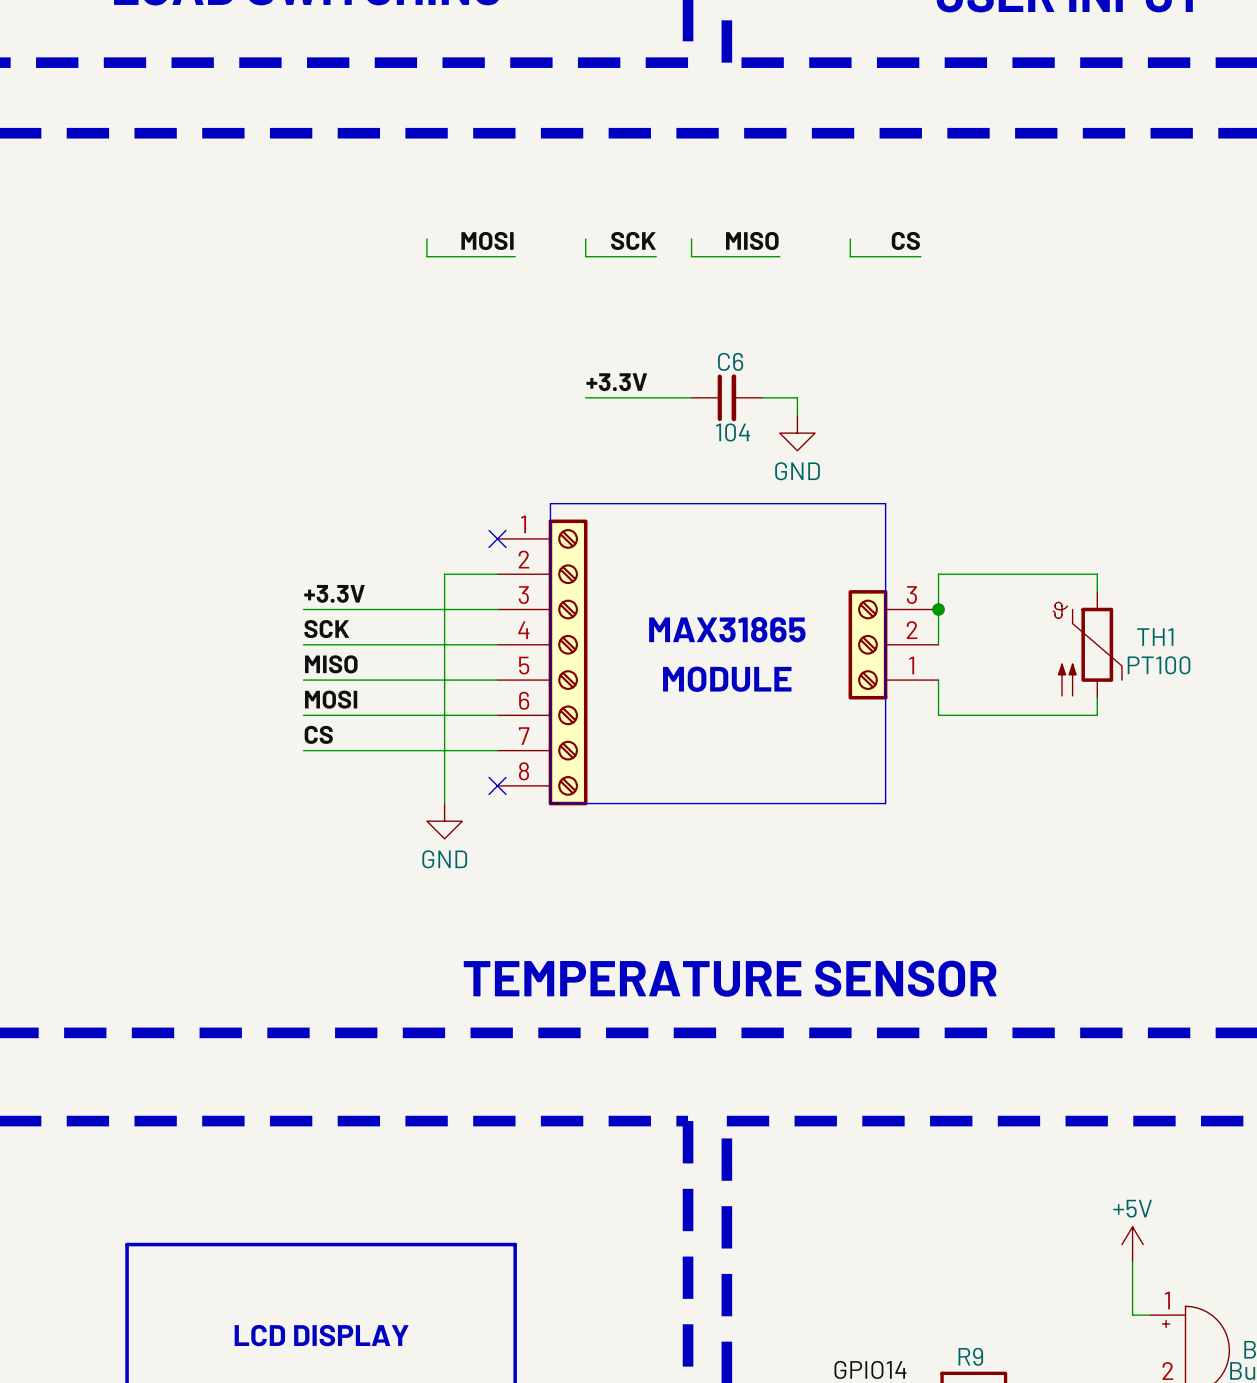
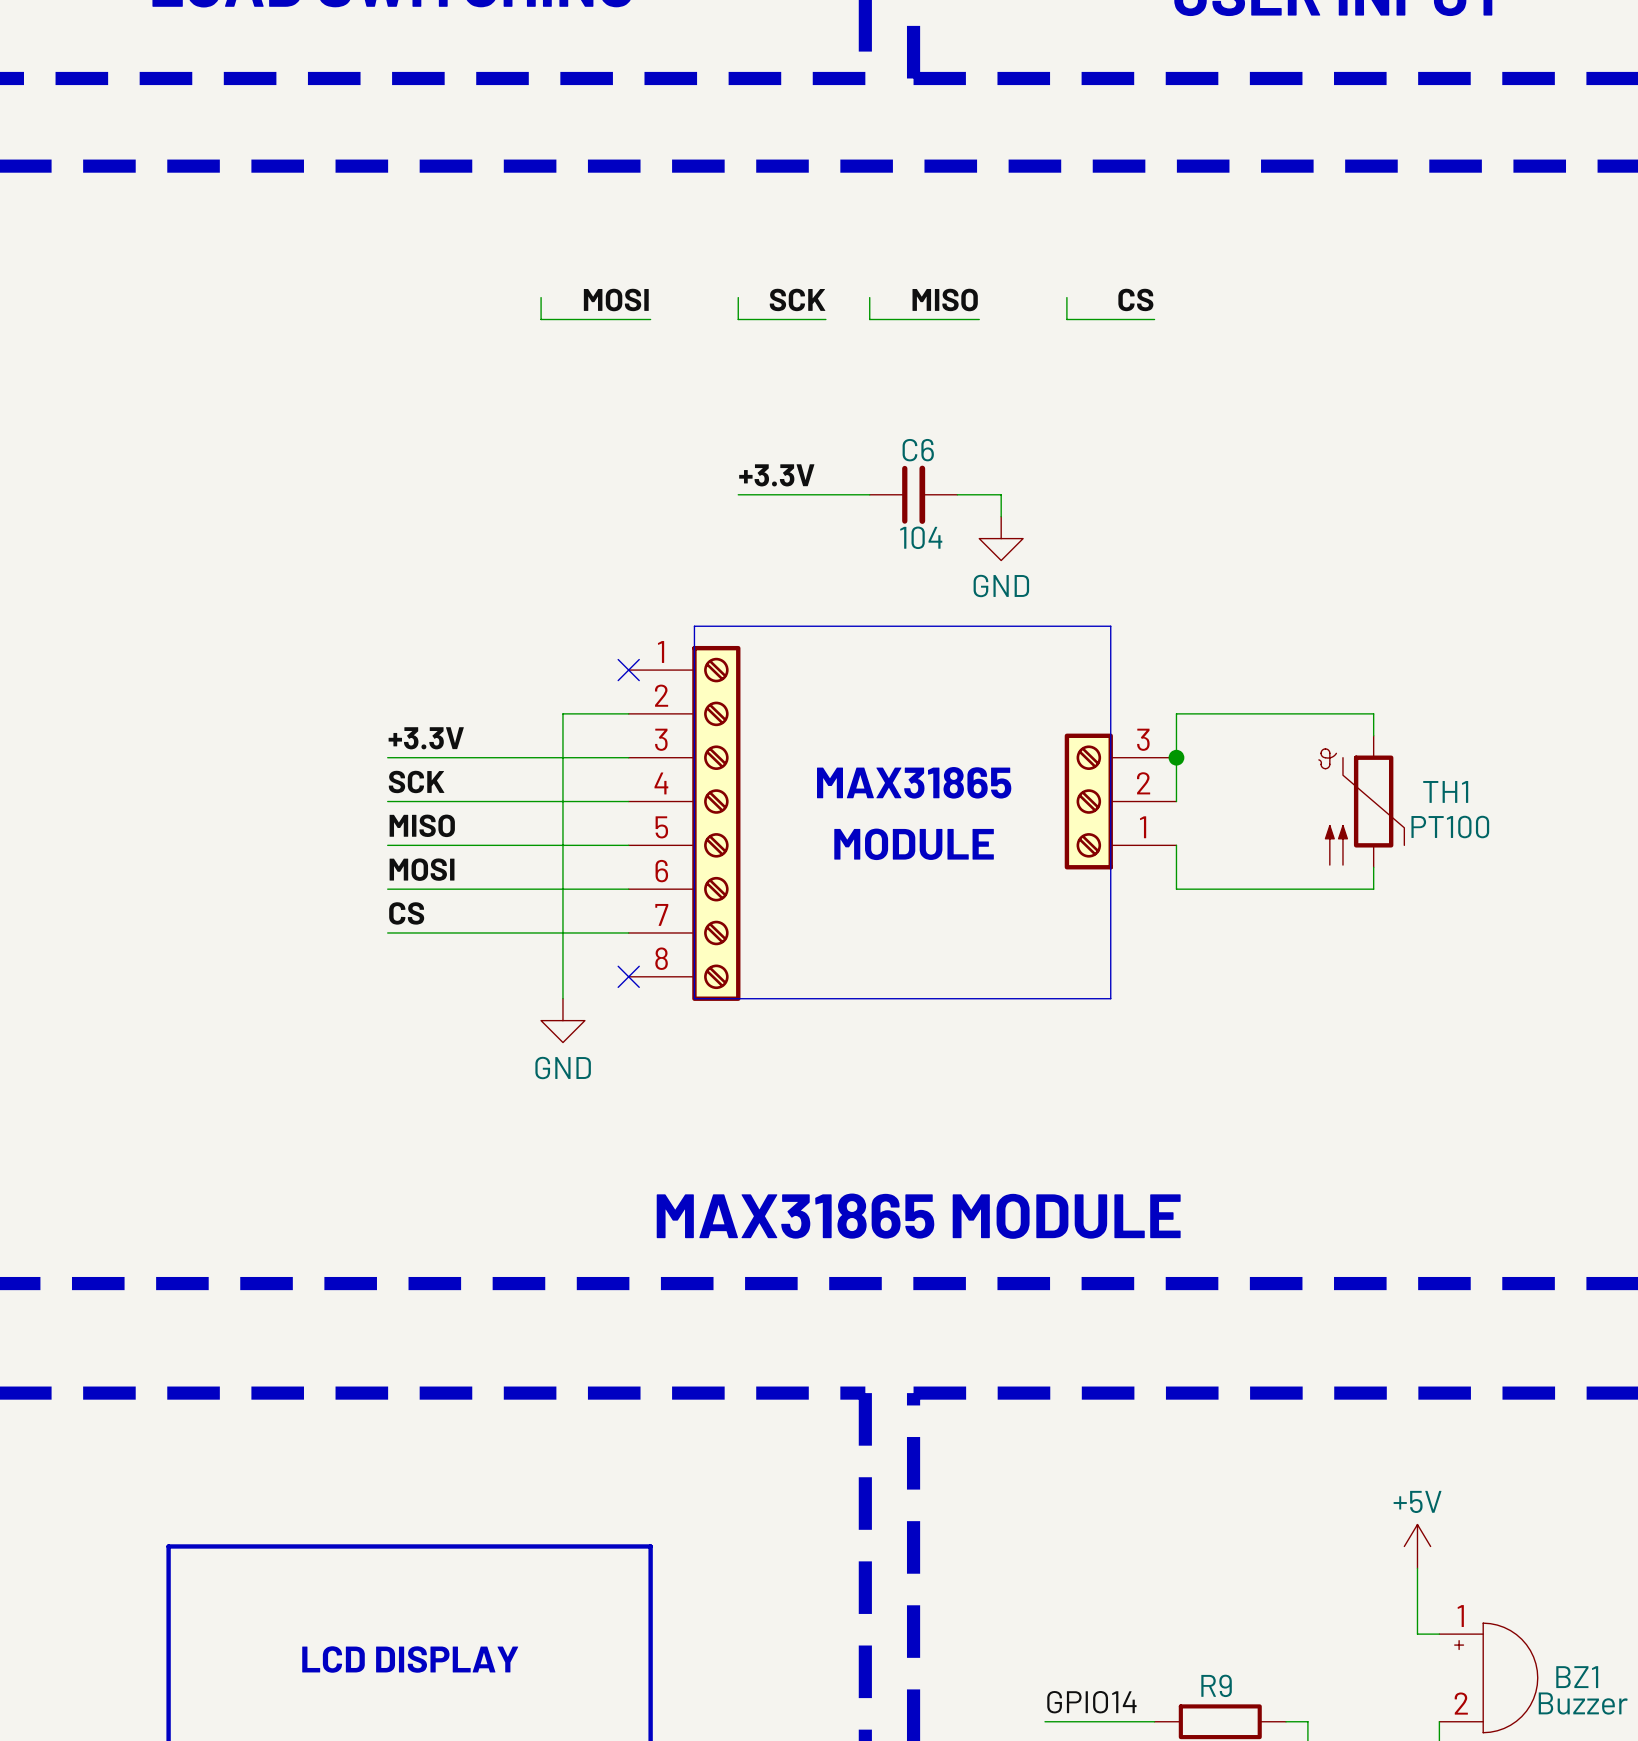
text: TEMPERATURE SENSOR (730, 978) -> MAX31865 MODULE (918, 1216)

